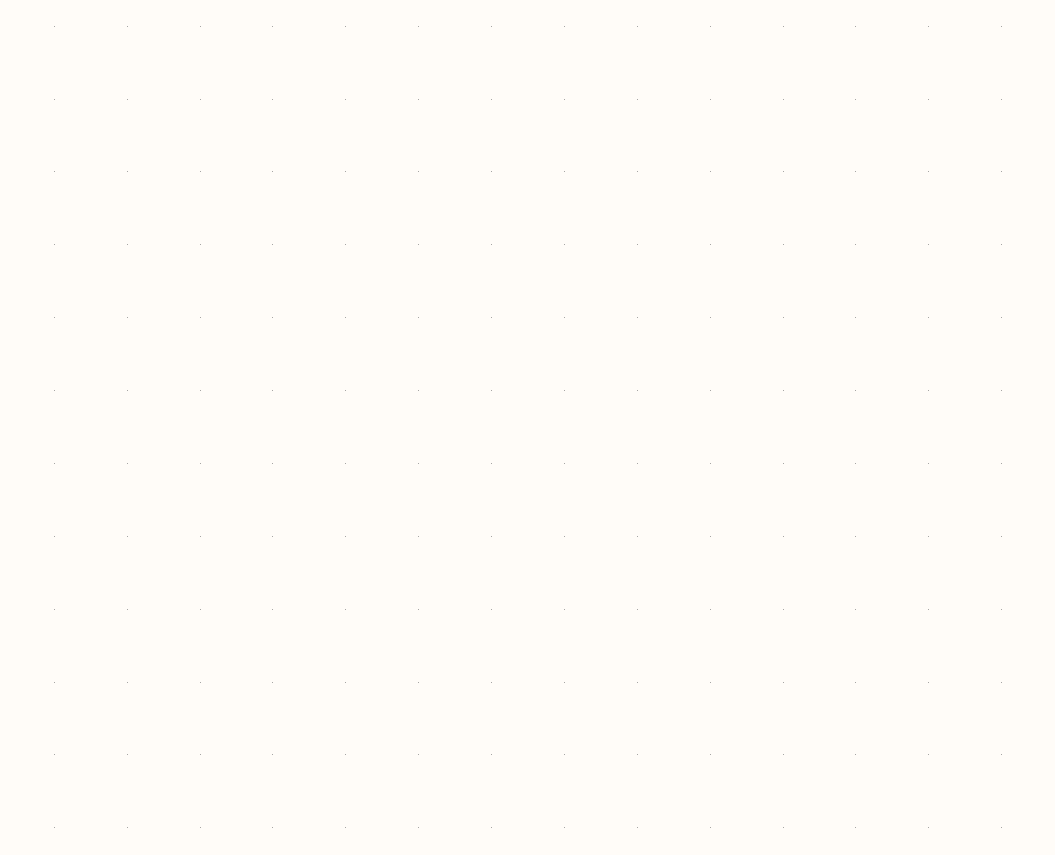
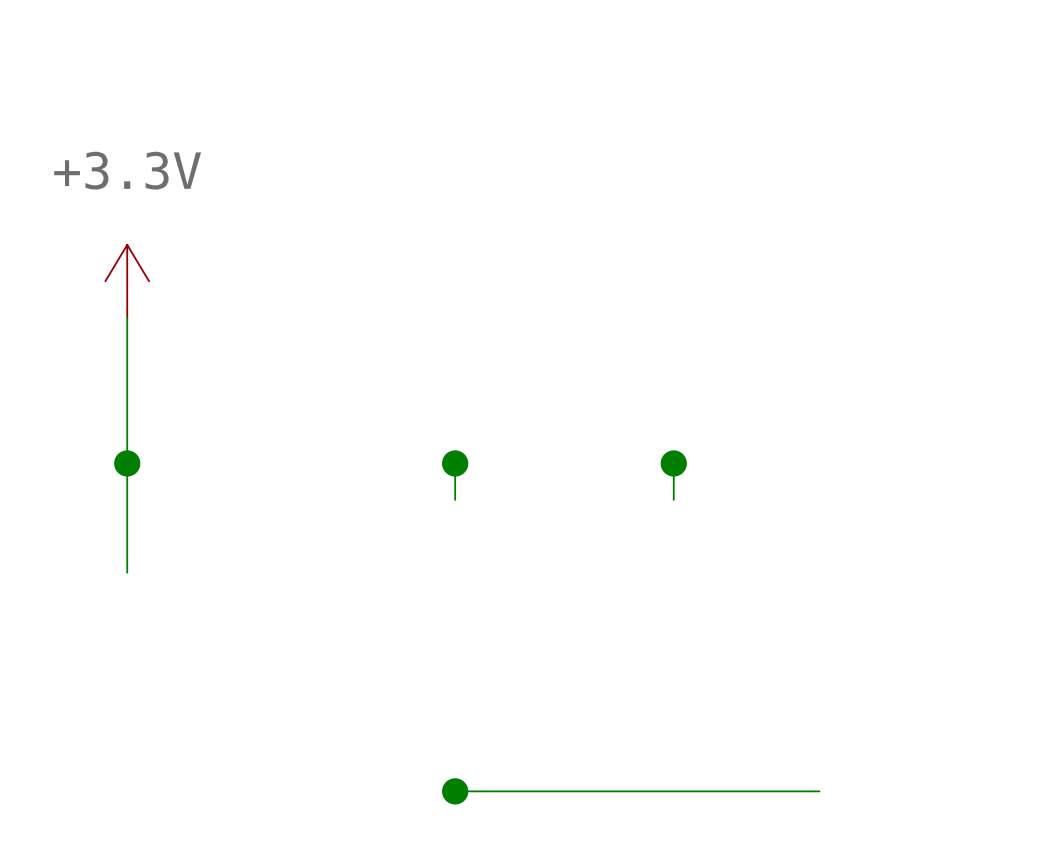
power symbol: none -> +3.3V (127, 281)
wire: none -> (127, 317) (127, 572)
junction: none -> (127, 463)
wire: none -> (455, 463) (455, 499)
junction: none -> (455, 463)
wire: none -> (673, 463) (673, 499)
junction: none -> (673, 463)
wire: none -> (455, 791) (819, 791)
junction: none -> (455, 791)

